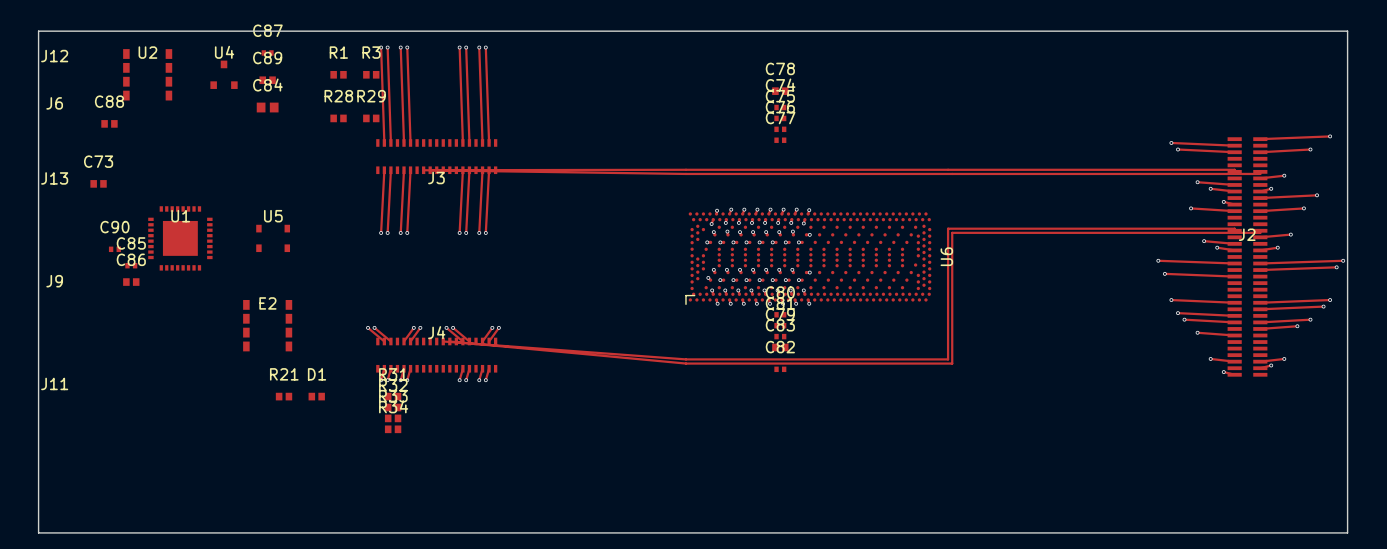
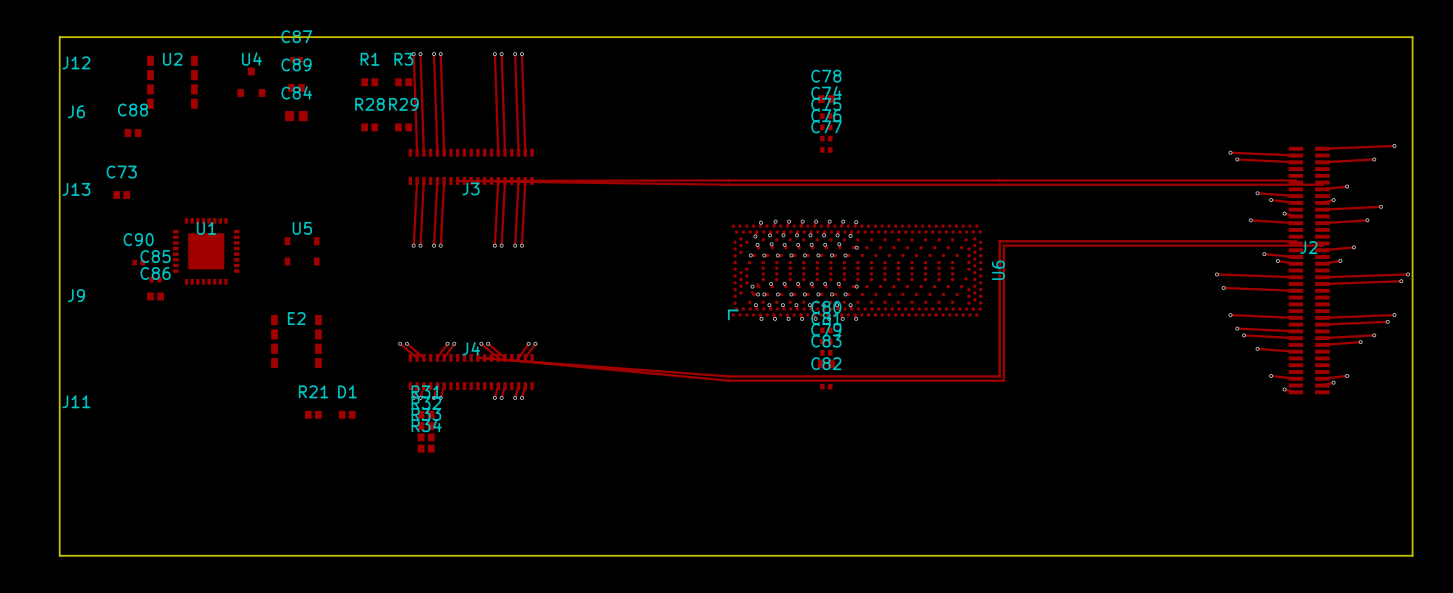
via: (713, 269) -> none
via: none -> (752, 286)
via: (708, 277) -> none
via: none -> (758, 294)

